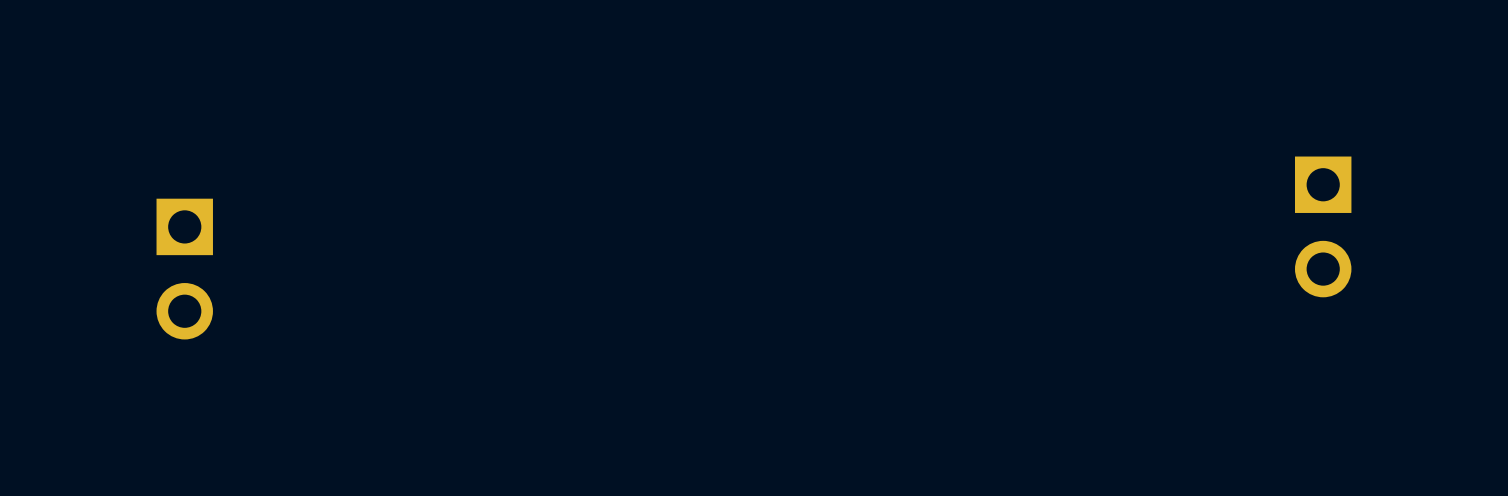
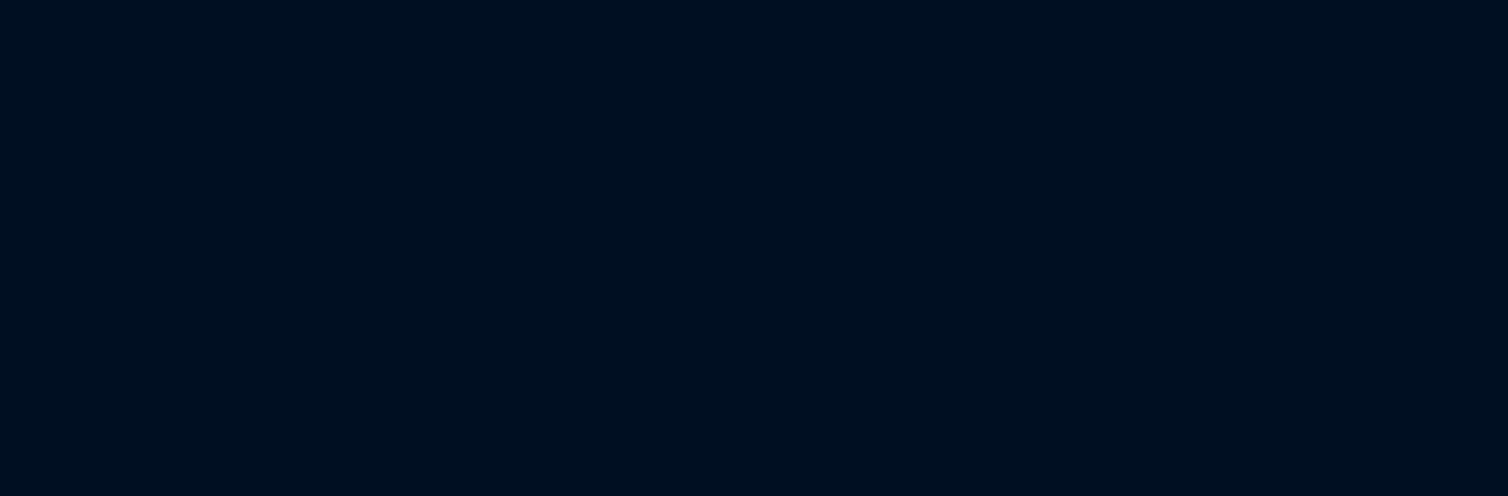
part: (1323, 226) -> none
part: (184, 269) -> none

